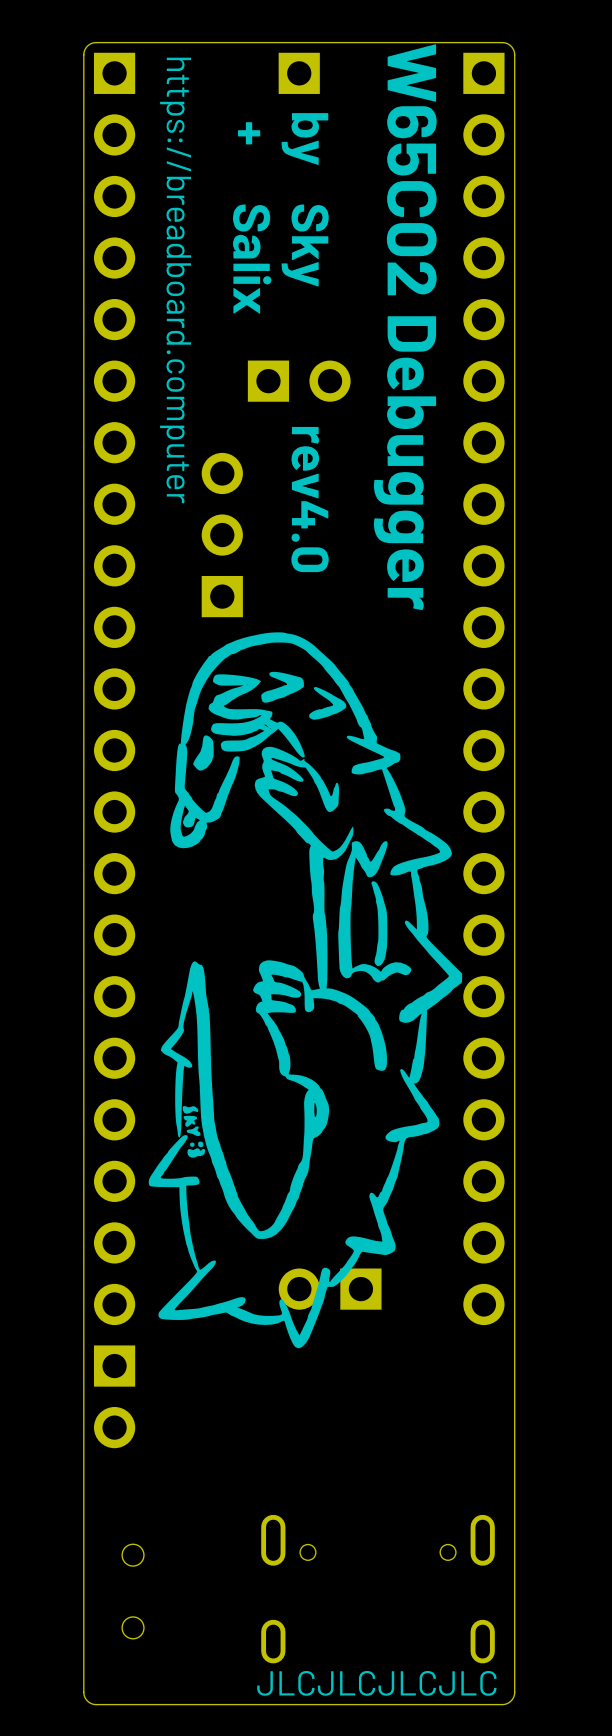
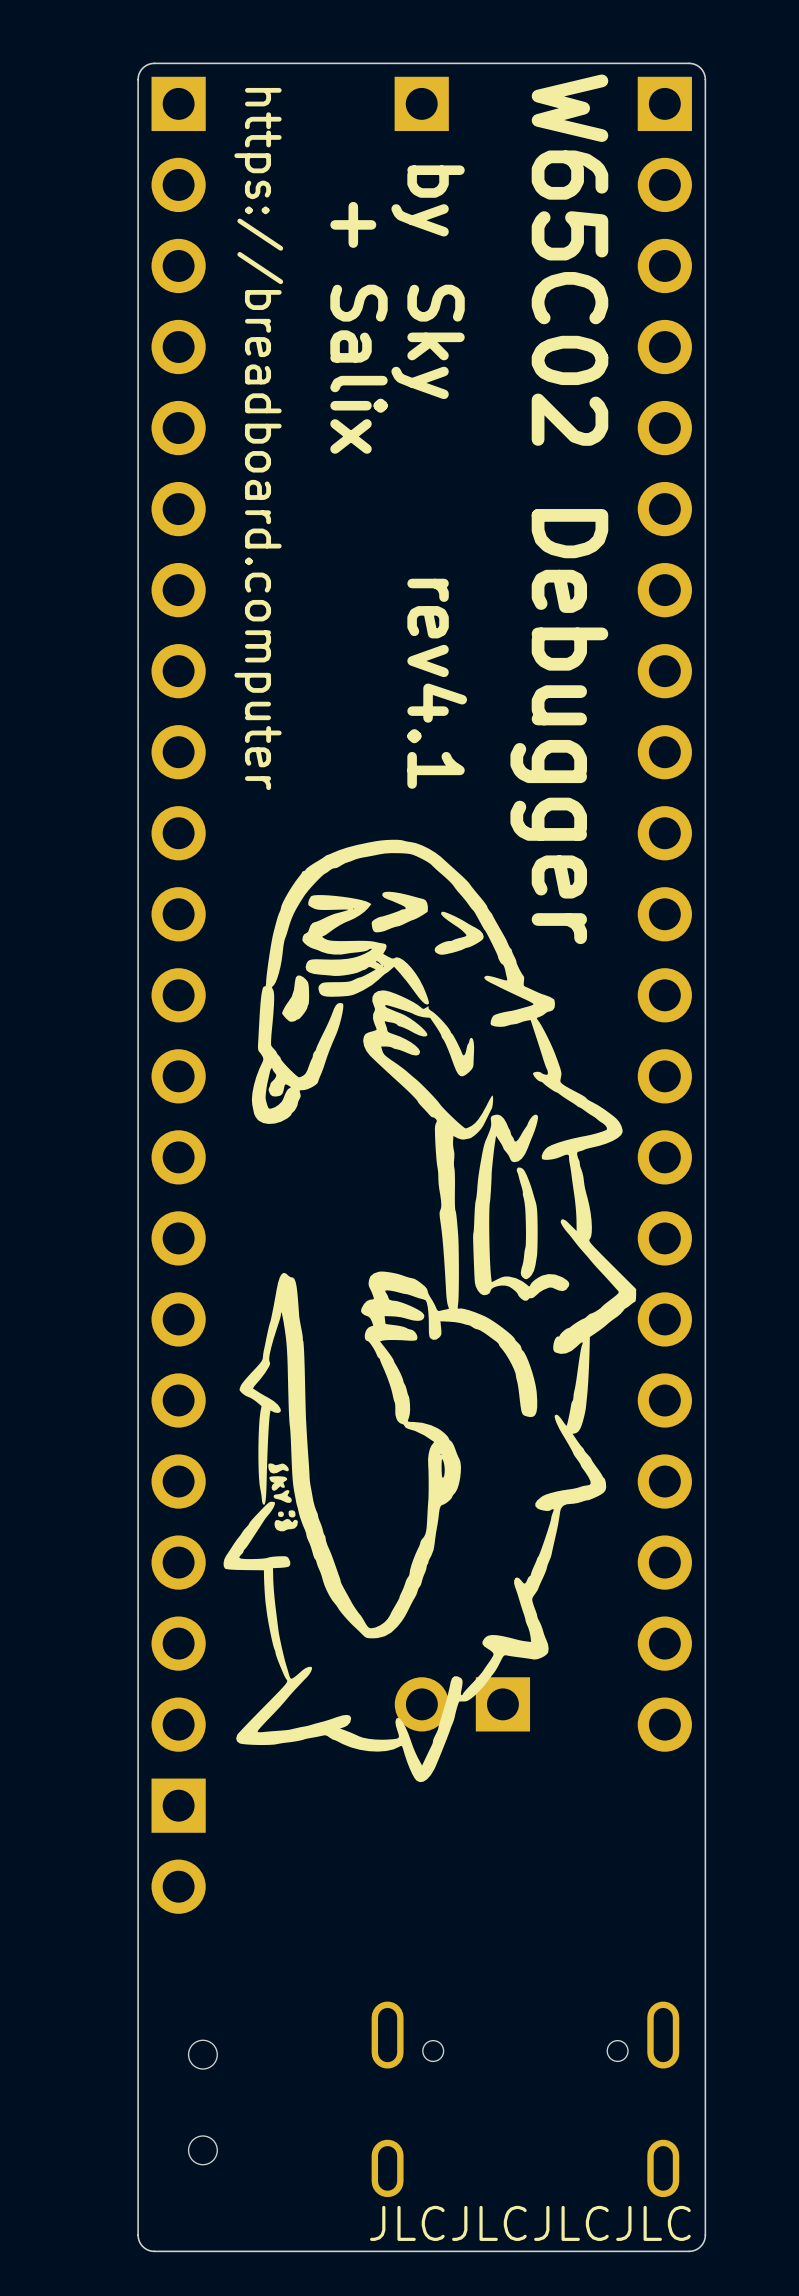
part: (299, 381) -> none
text: rev4.0 (310, 499) -> rev4.1 (437, 683)
part: (222, 535) -> none

